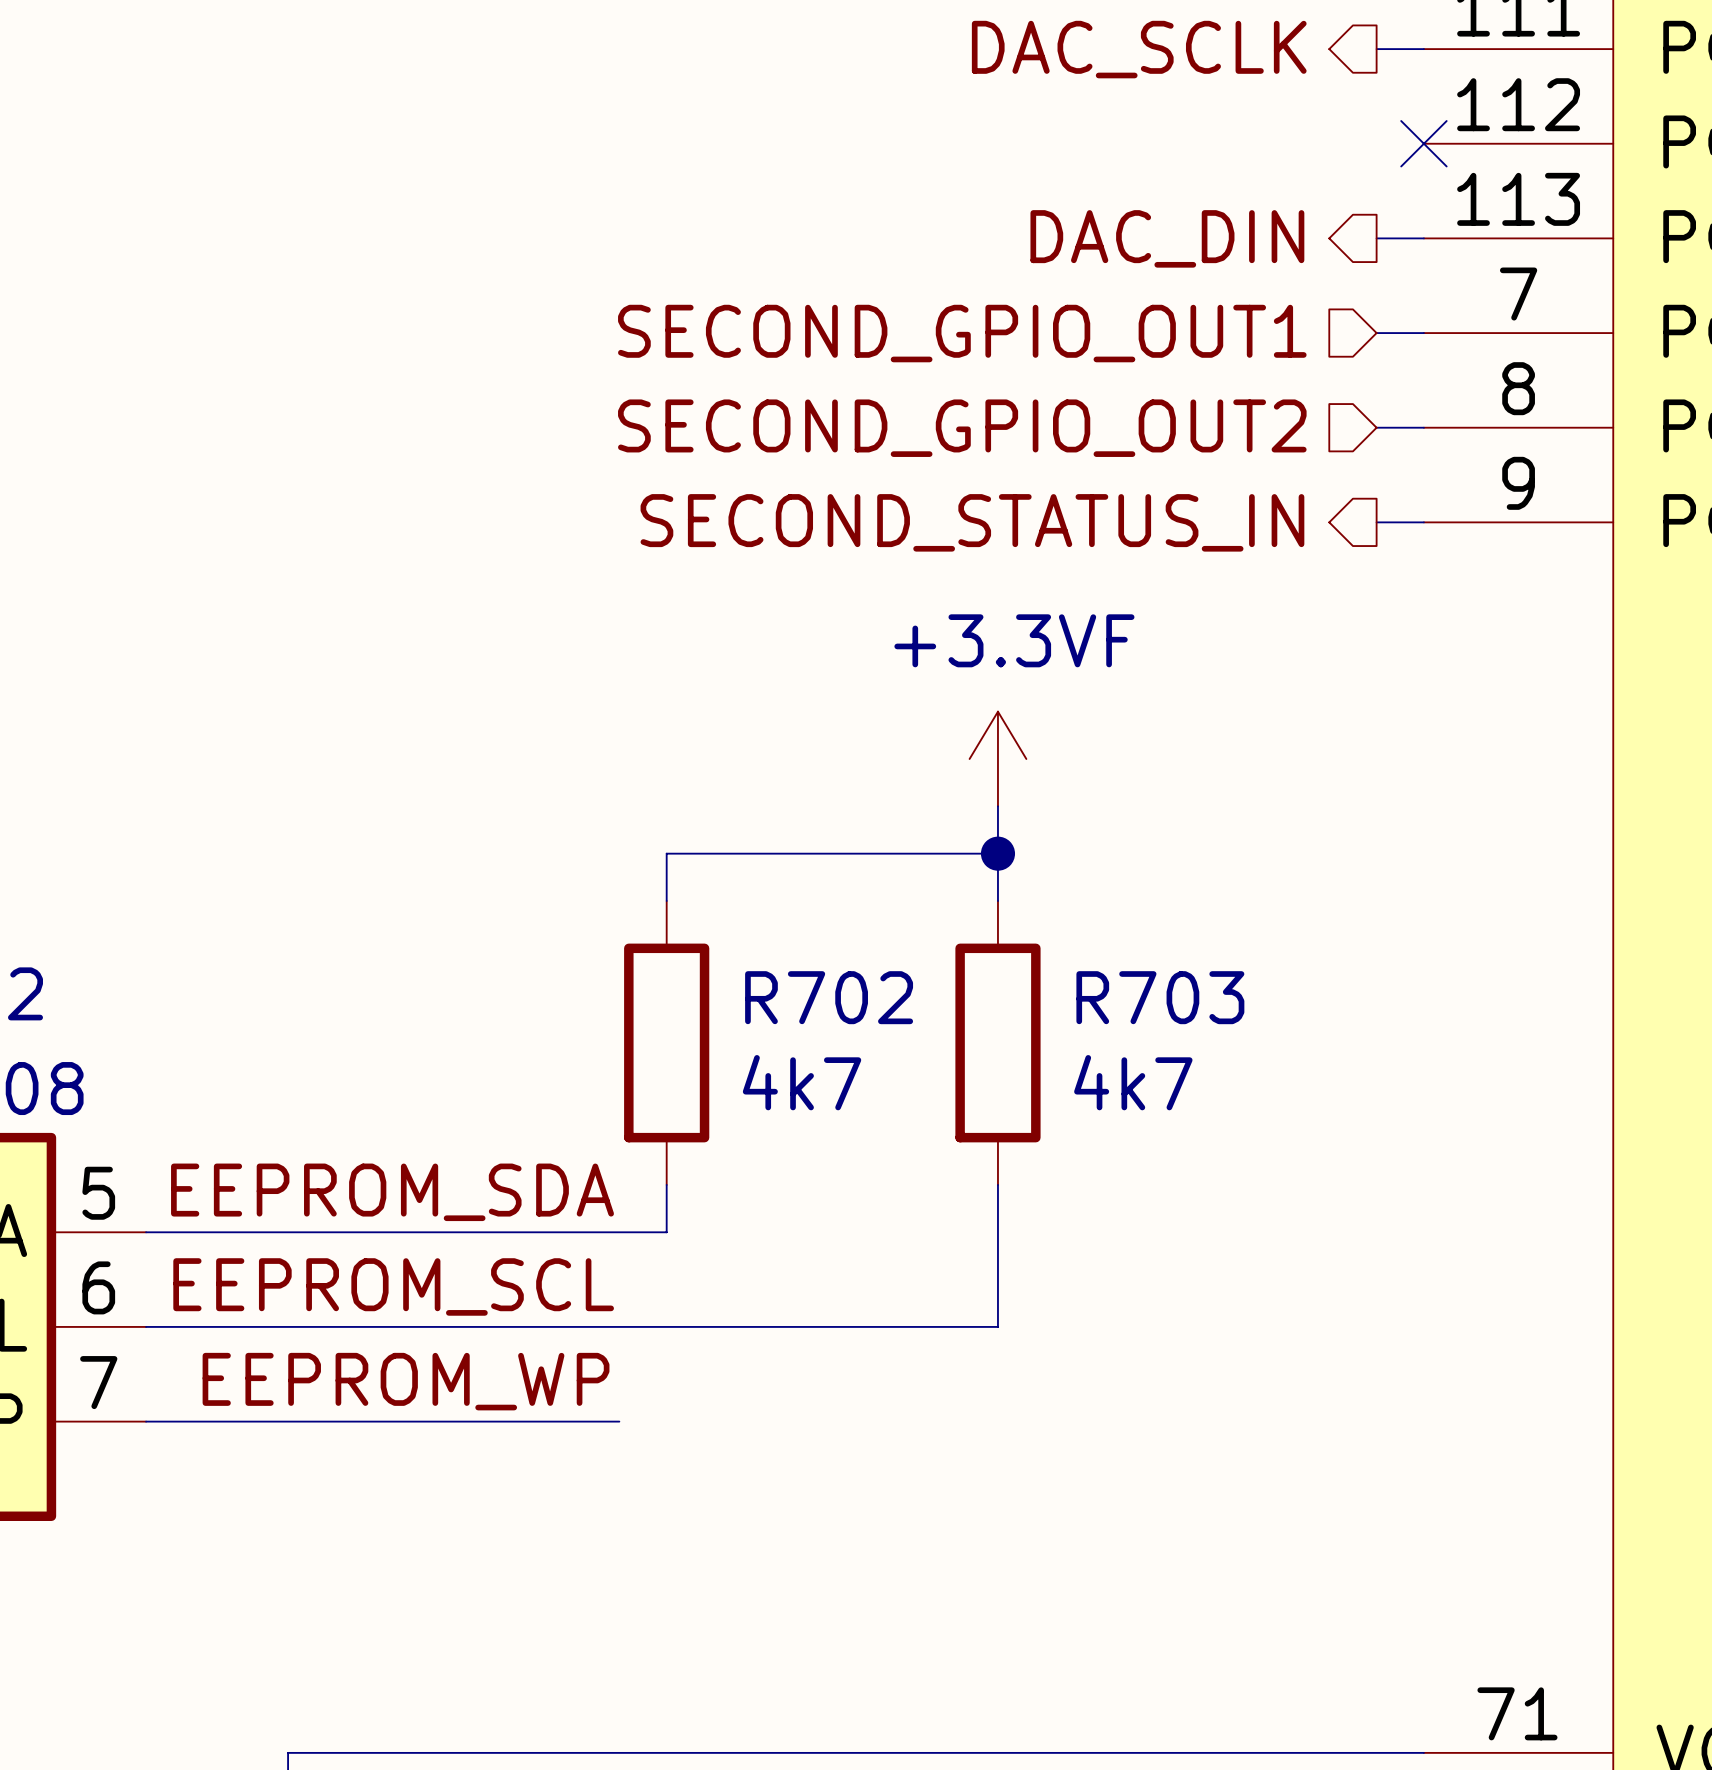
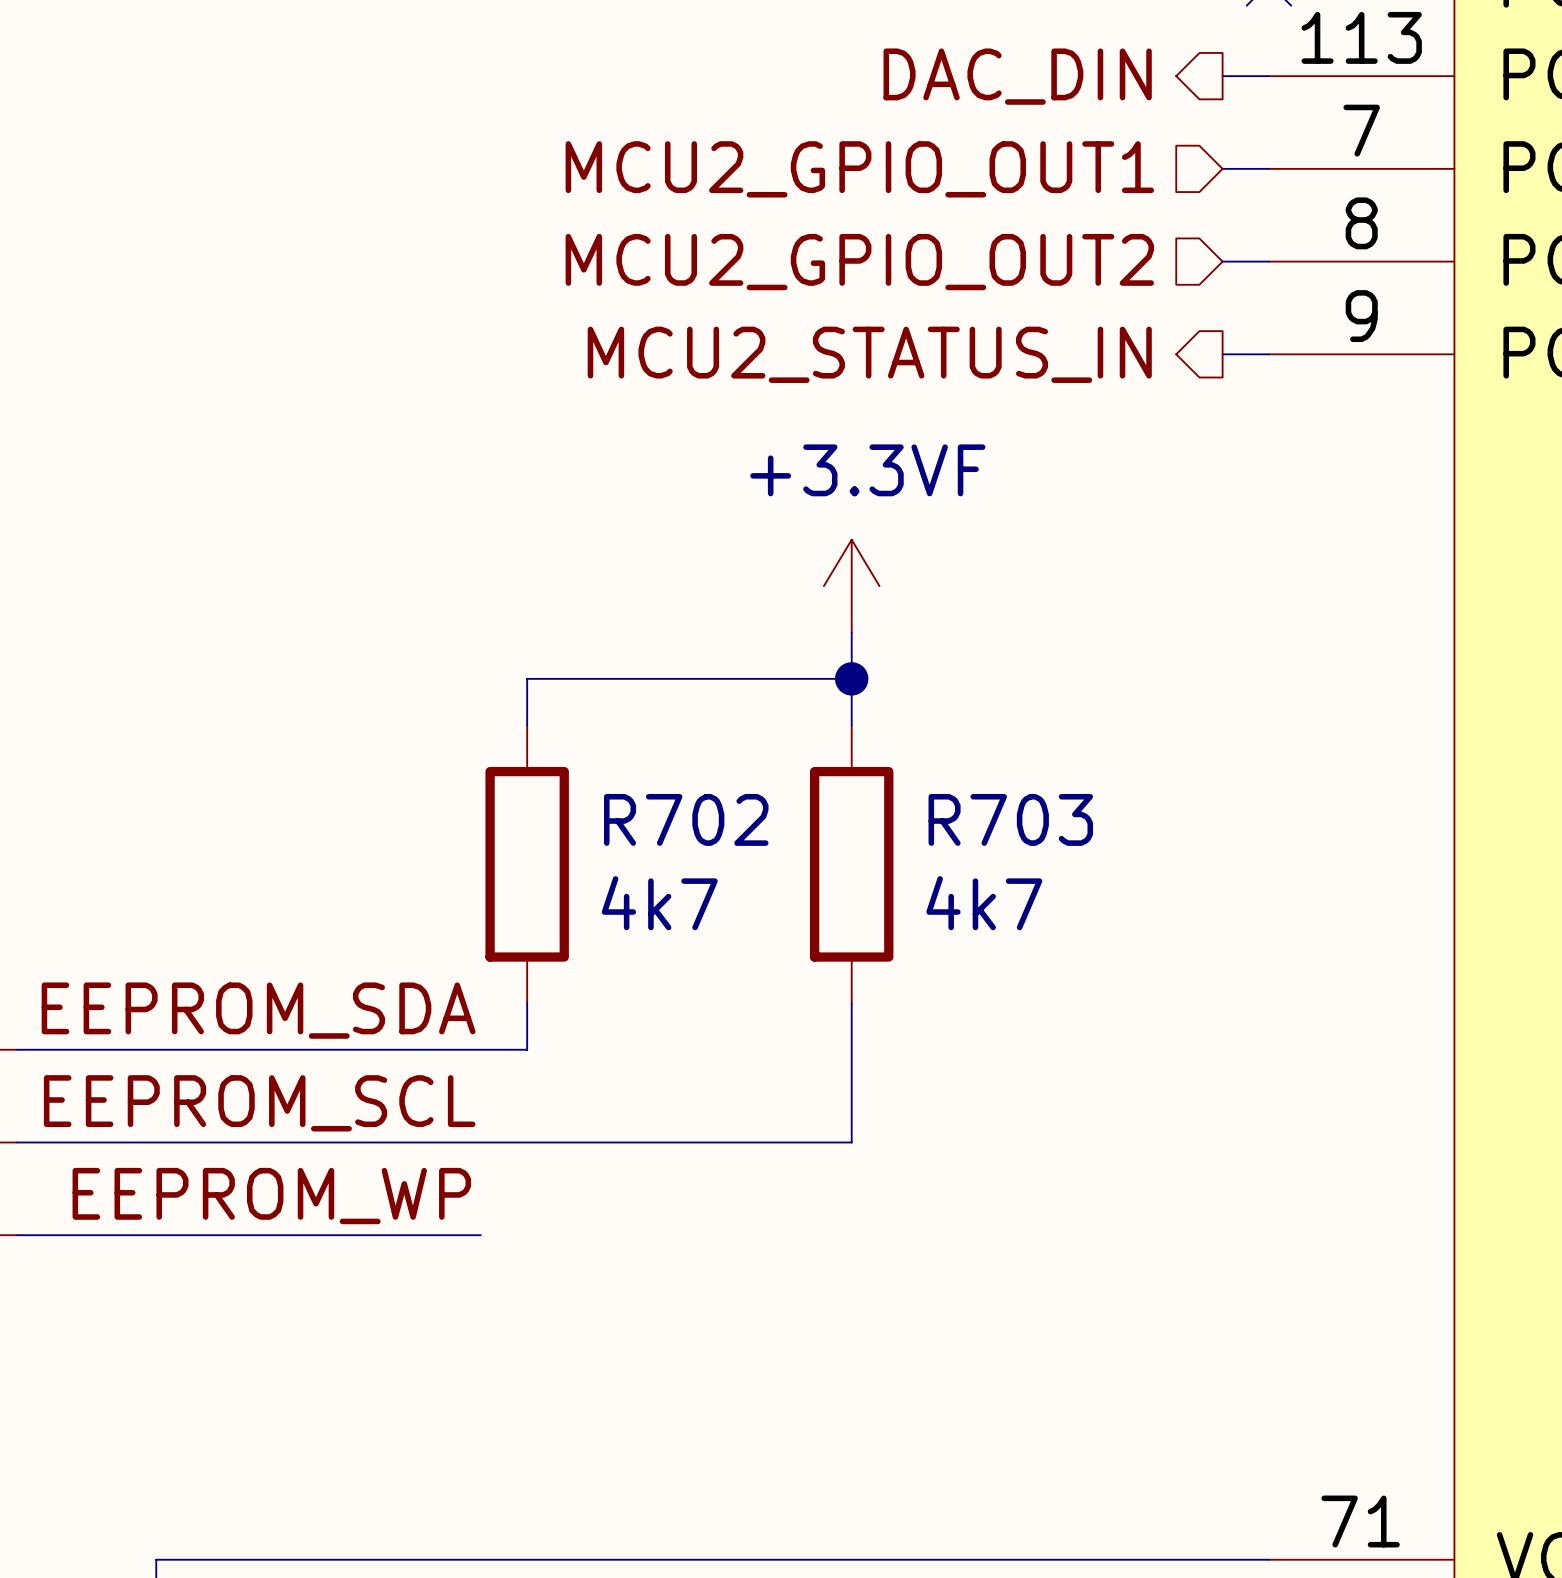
hierarchical label: SECOND_GPIO_OUT1 (962, 333) -> MCU2_GPIO_OUT1 (859, 169)
hierarchical label: SECOND_GPIO_OUT2 (962, 428) -> MCU2_GPIO_OUT2 (859, 262)
hierarchical label: SECOND_STATUS_IN (972, 522) -> MCU2_STATUS_IN (869, 354)

